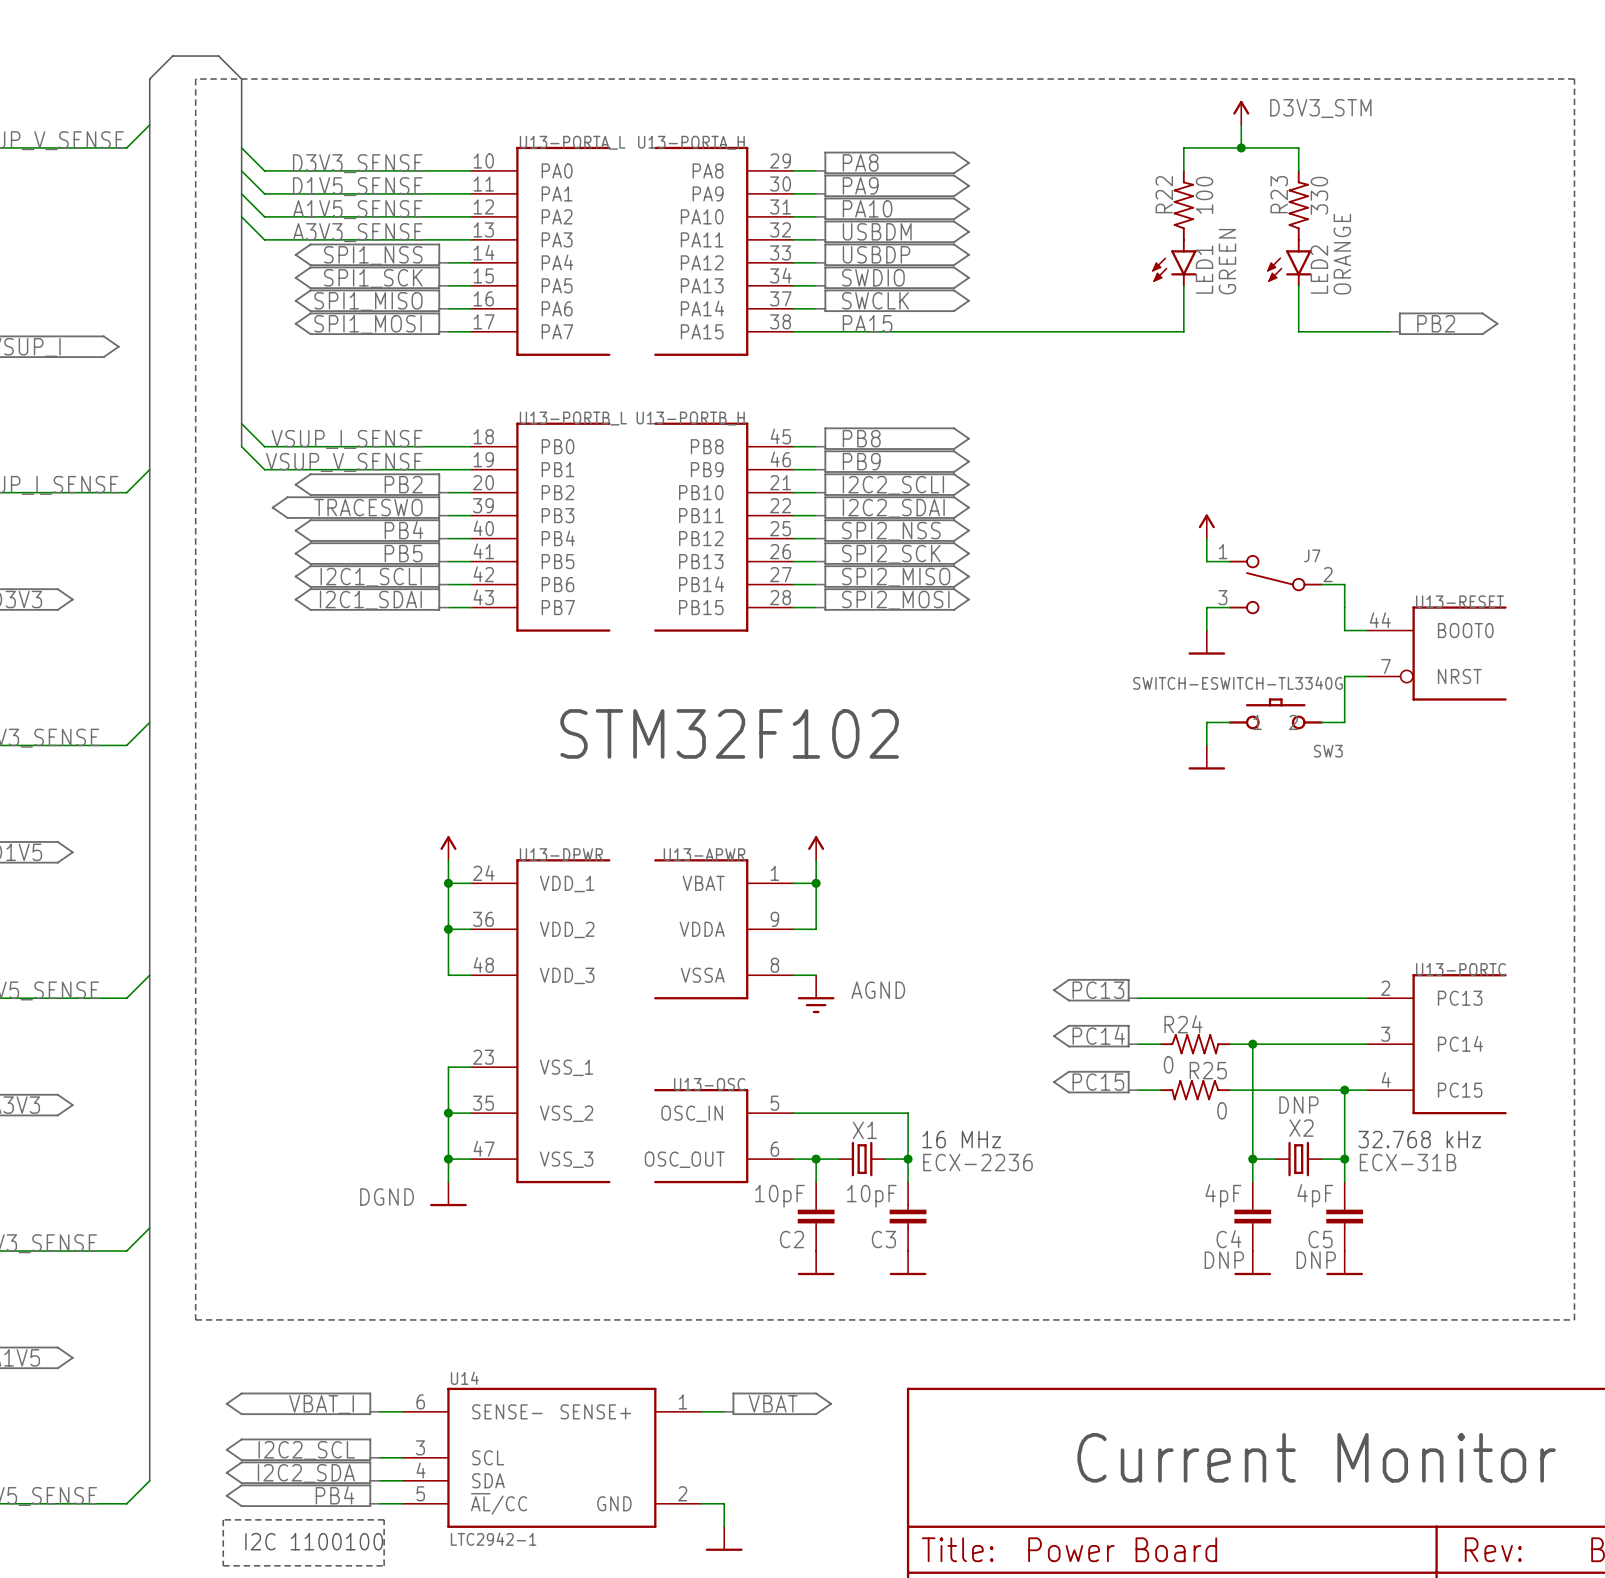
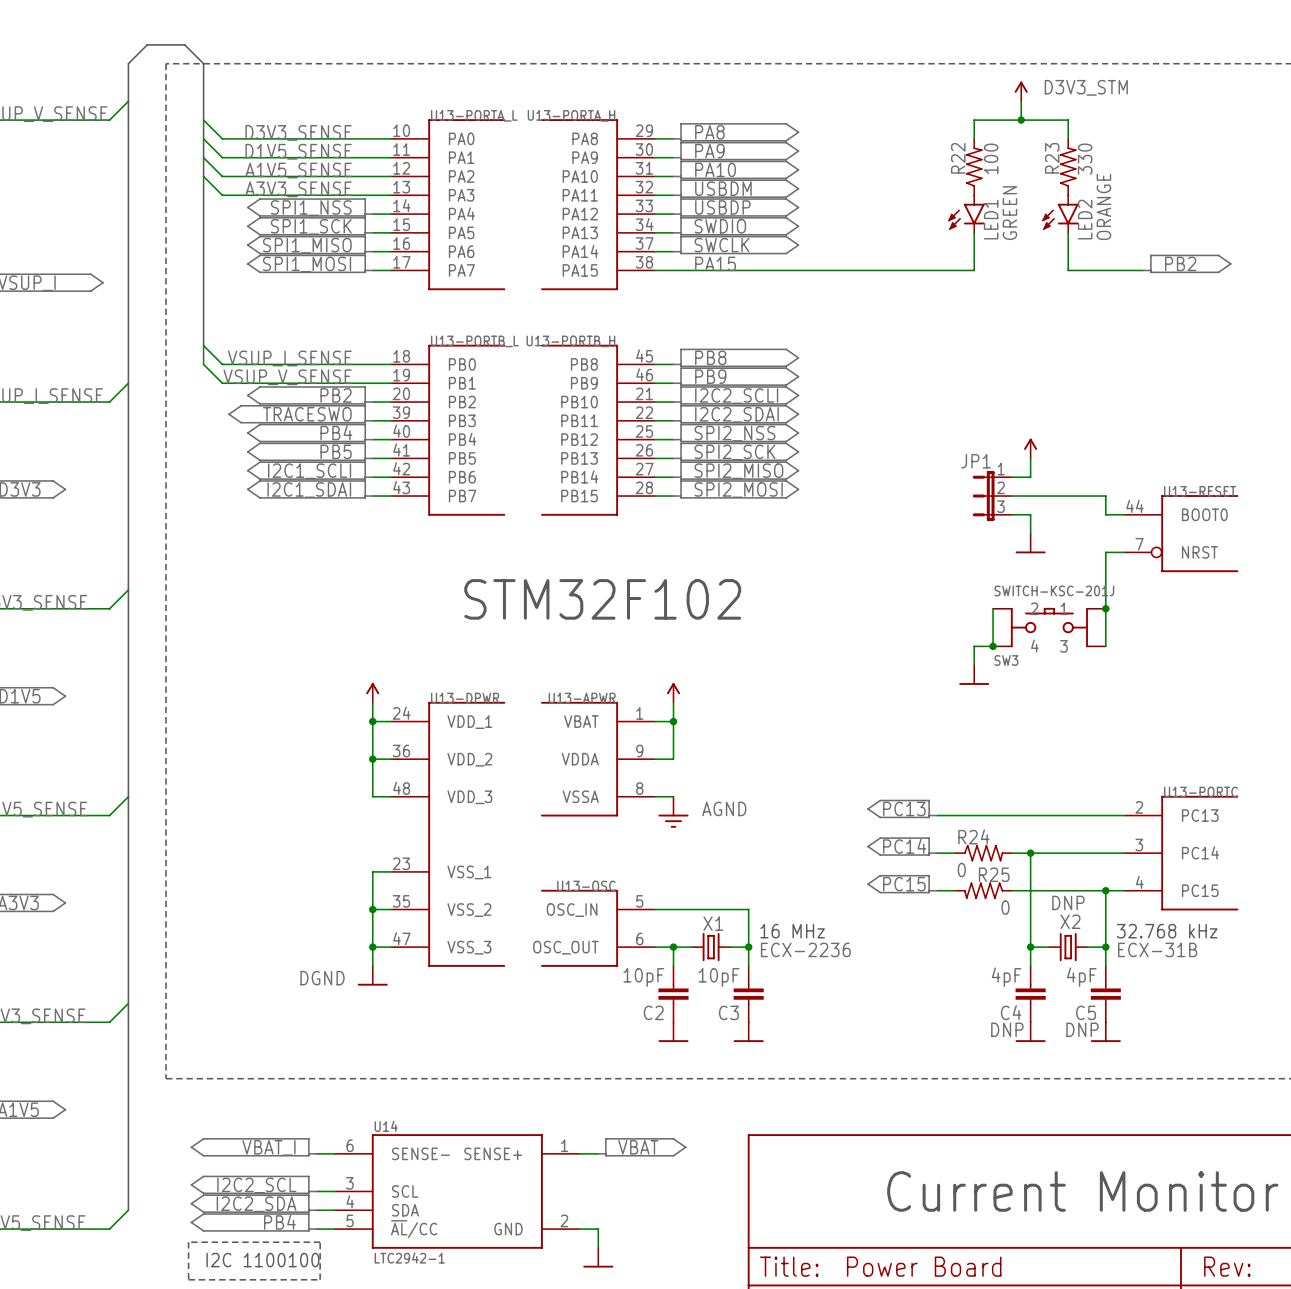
power symbol position: (1206, 526) -> (1030, 448)
wire: (1206, 538) (1206, 561) (1229, 561) -> none
wire: none -> (1030, 458) (1030, 477) (1011, 477)
J7: (1275, 584) -> none
wire: (1321, 584) (1344, 584) (1344, 607) -> (1011, 496) (1105, 496)
JP1: none -> (992, 496)
wire: none -> (1011, 514) (1030, 514) (1030, 533)
power symbol: (1206, 642) -> none
power symbol: none -> (1030, 543)
SW3 value: SWITCH-ESWITCH-TL3340G (1237, 683) -> SWITCH-KSC-201J (1054, 590)
SW3 symbol: [1228, 698, 1323, 730] -> [993, 607, 1106, 648]
wire: (1229, 722) (1206, 722) (1206, 745) -> (974, 665) (974, 646) (993, 646) (993, 608)
wire: (1321, 722) (1344, 722) -> (1105, 646) (1105, 589)
junction: none -> (1105, 608)
SW3 name position: SW3 (1328, 751) -> SW3 (1006, 660)
power symbol: (1206, 757) -> none
junction: none -> (993, 646)
power symbol: none -> (974, 675)

